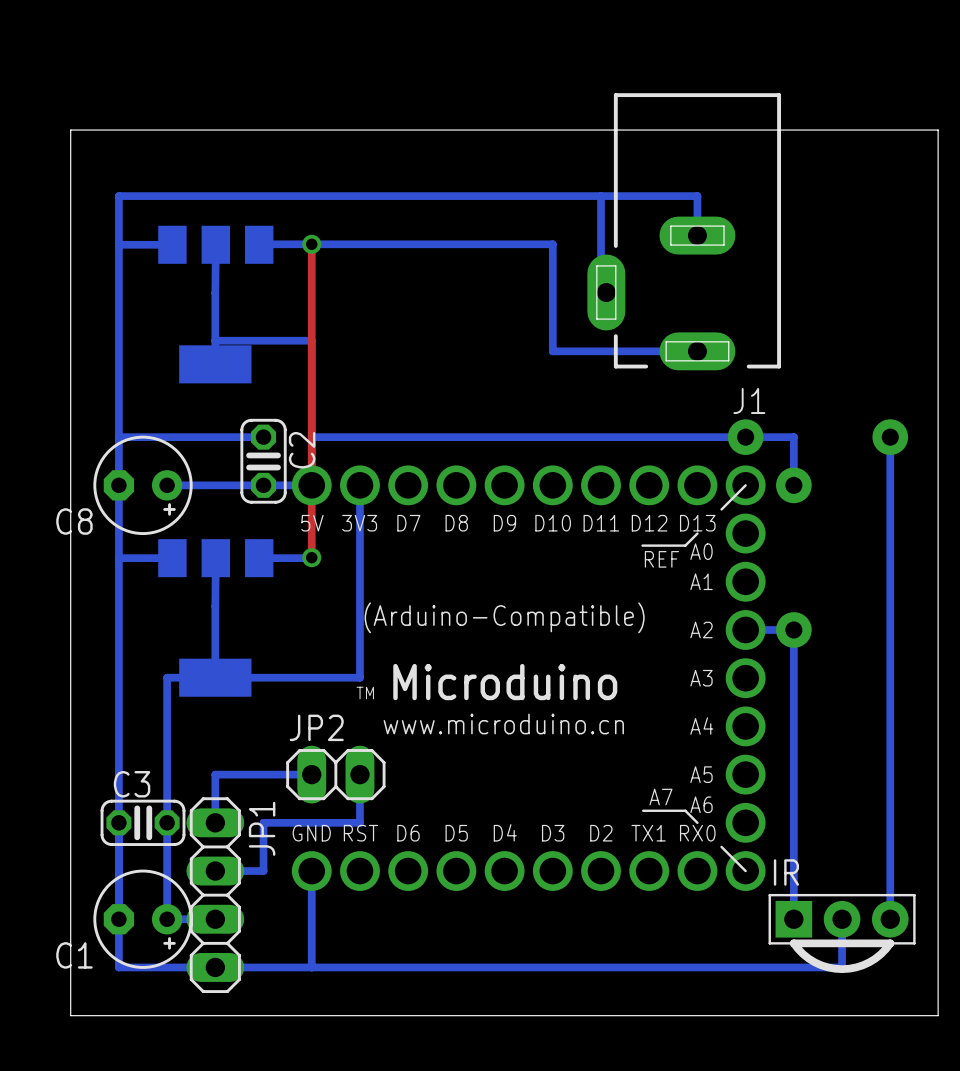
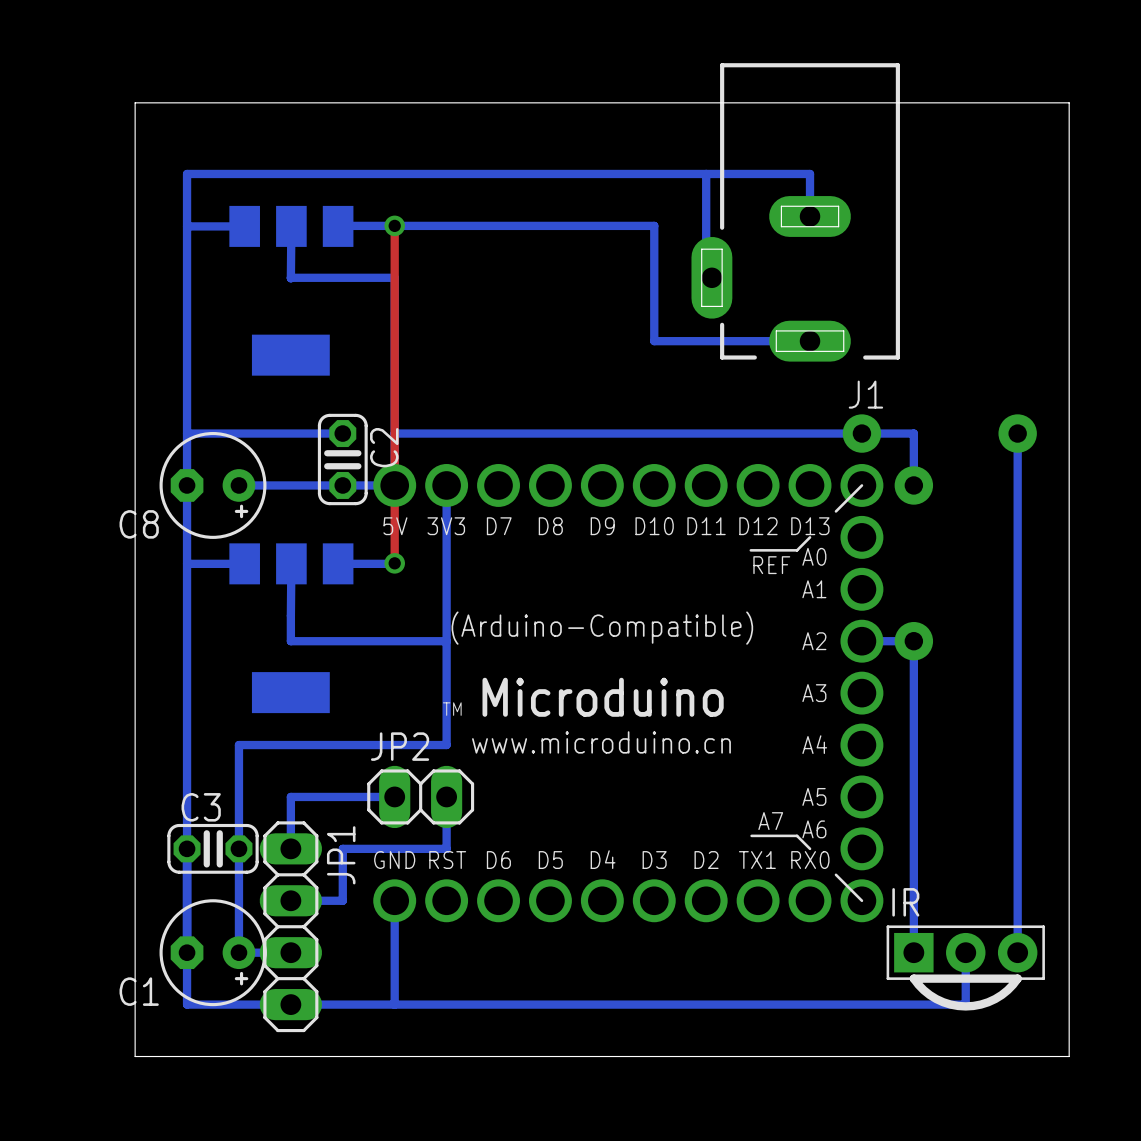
bottom track: (215, 292) (215, 364) -> none
bottom track: (215, 340) (311, 340) -> (290, 278) (394, 277) (394, 329)
bottom track: (215, 629) (215, 677) -> (290, 641) (446, 641)
bottom track: (359, 677) (167, 677) (167, 726) -> (446, 692) (446, 745) (238, 745)

